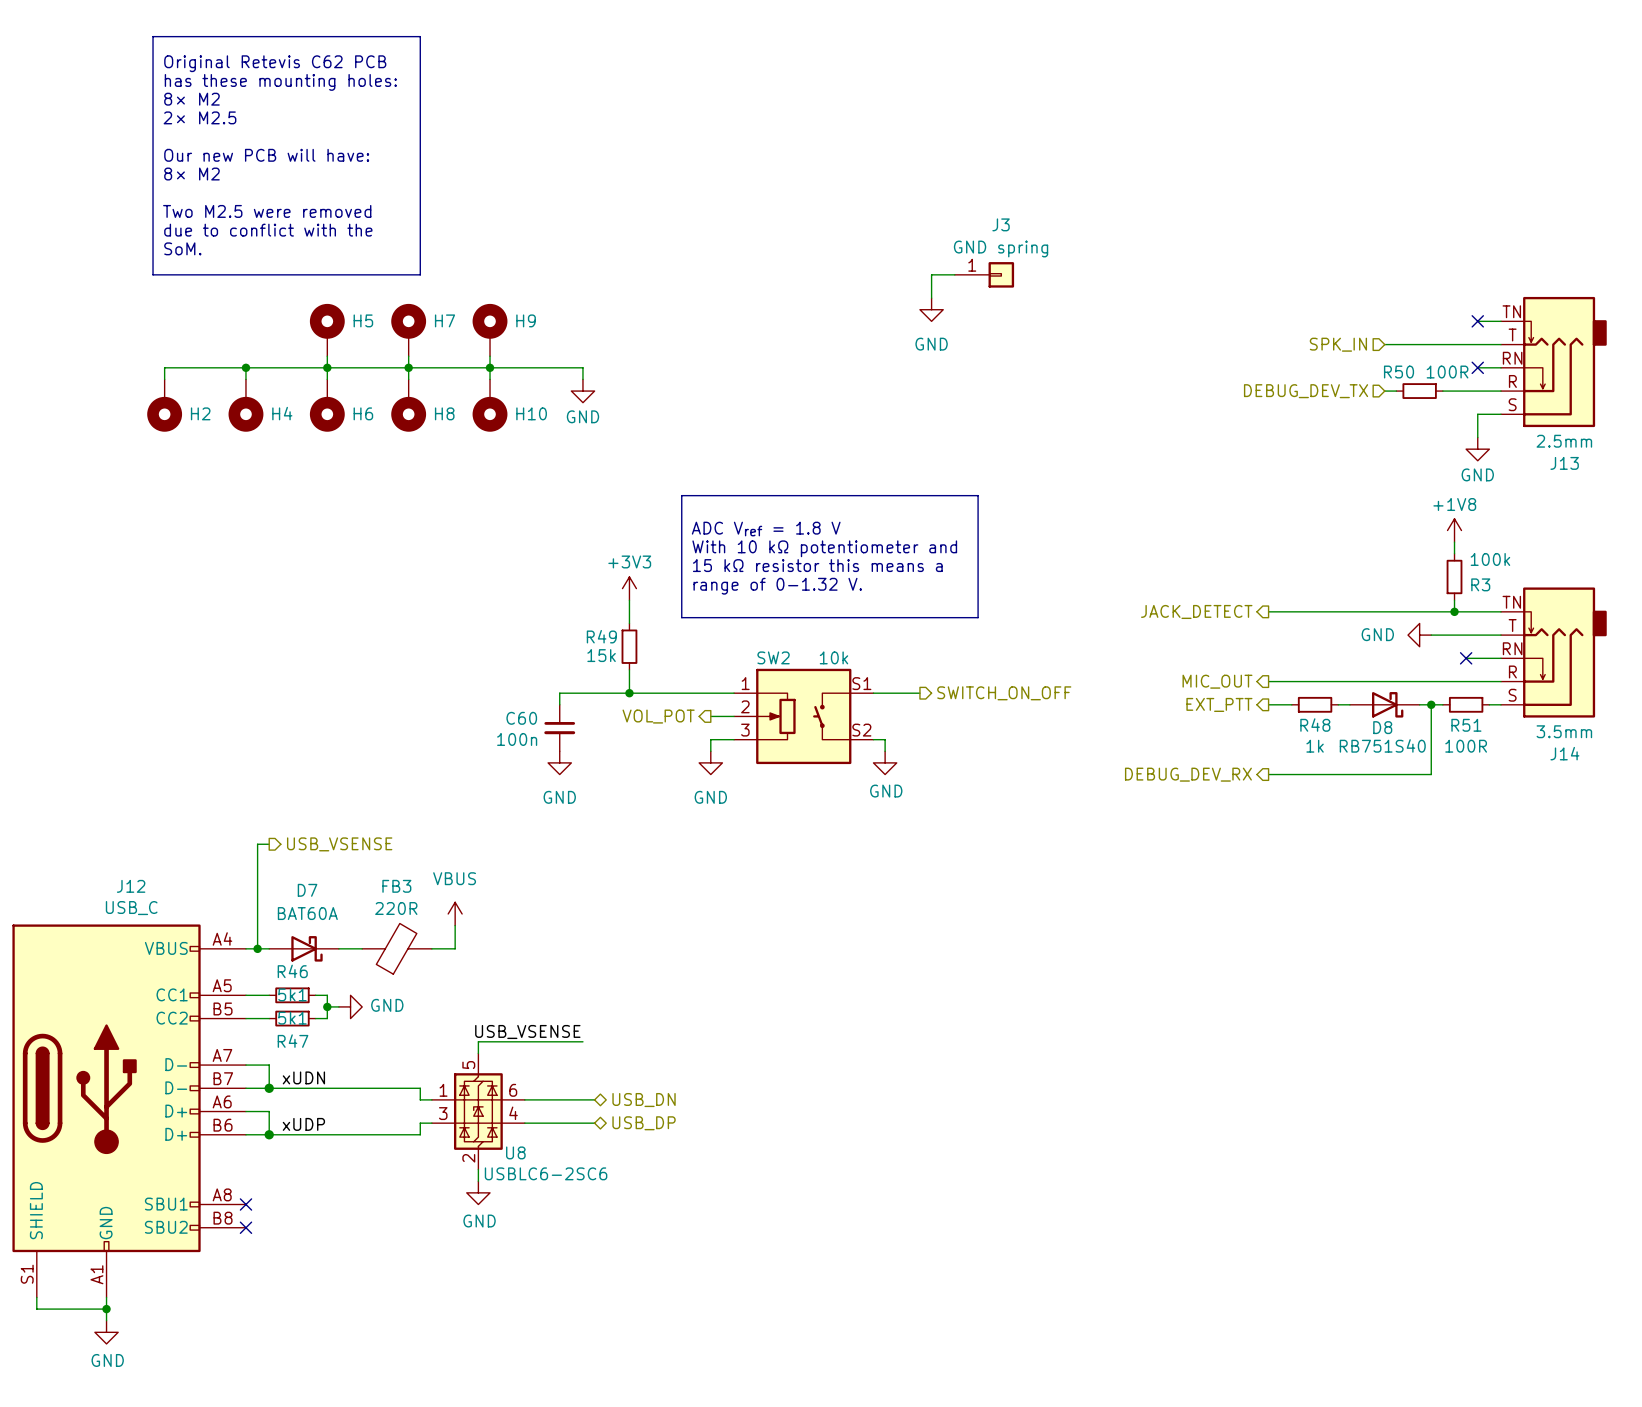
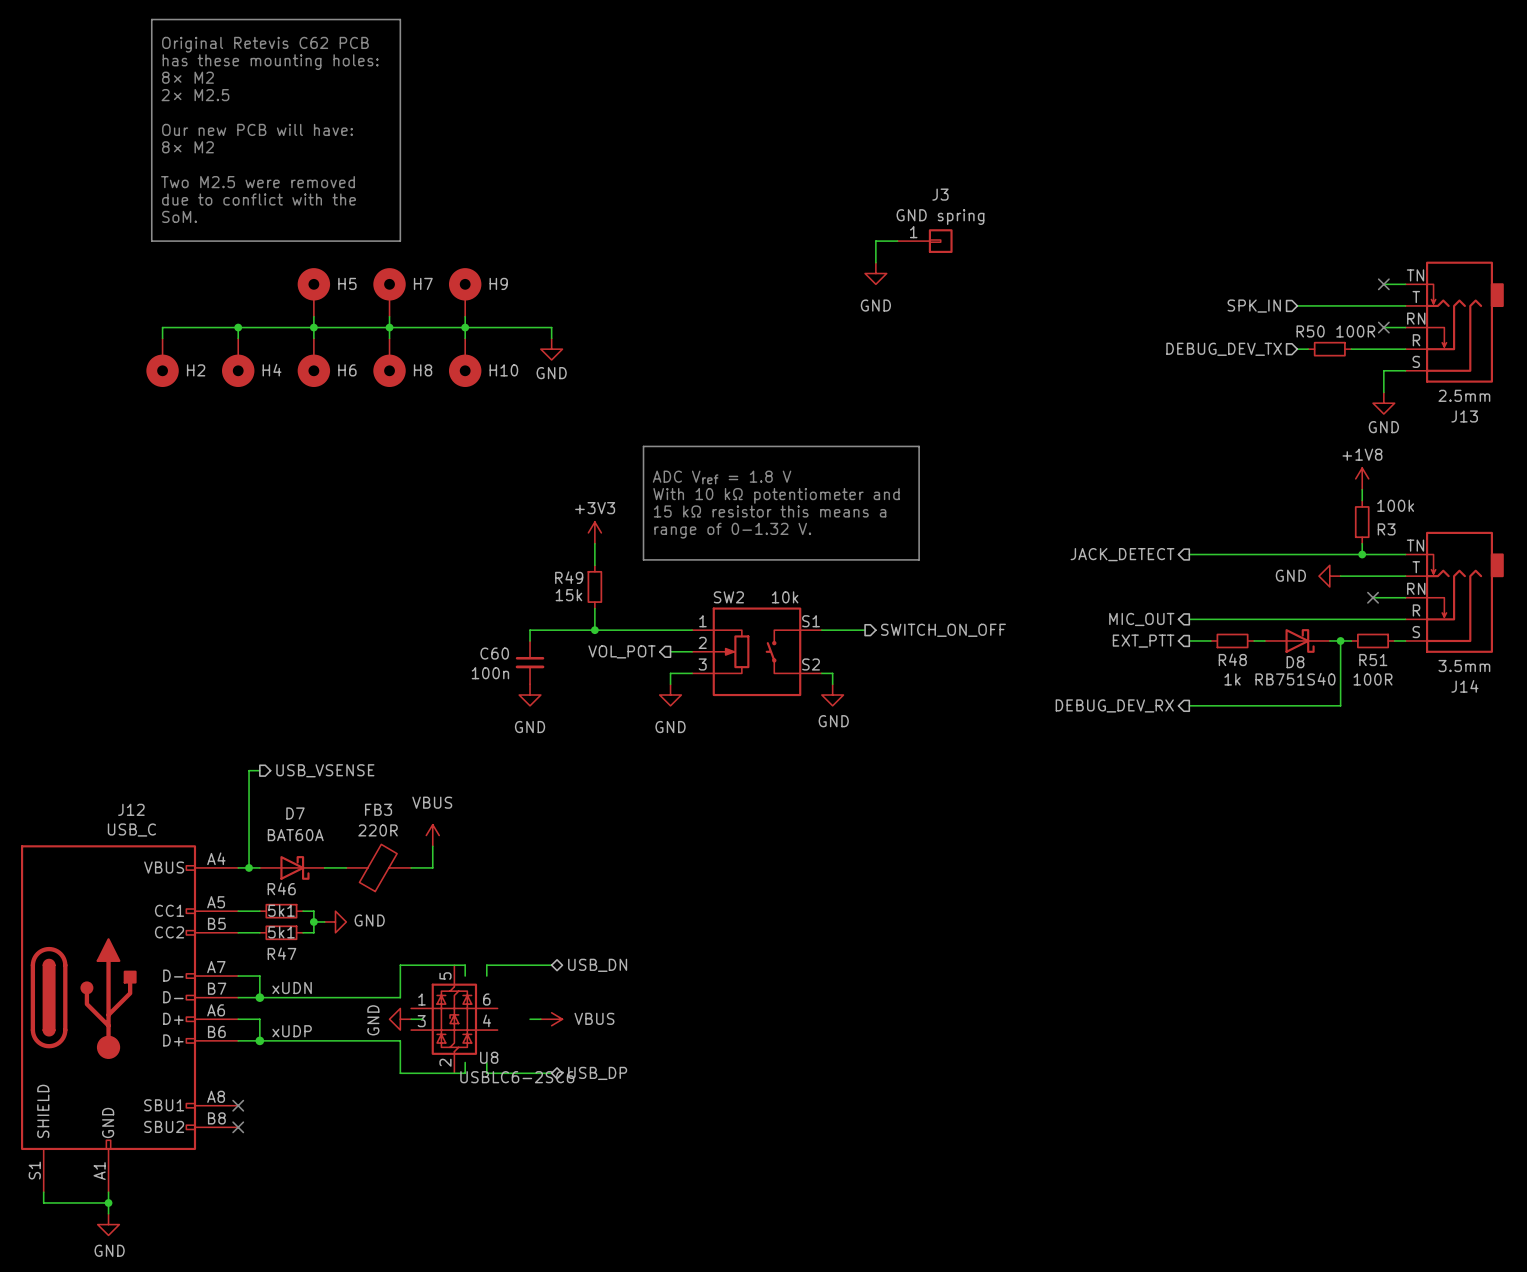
label: USB_VSENSE (527, 1031) -> none
wire: (582, 1041) (478, 1041) (478, 1053) -> none
wire: none -> (551, 965) (486, 965) (486, 976)
wire: (420, 1088) (420, 1099) (431, 1099) -> (400, 997) (400, 965) (465, 965) (465, 976)
wire: (524, 1099) (594, 1099) -> none
hierarchical label position: USB_DN (644, 1100) -> USB_DN (597, 965)
wire: none -> (411, 1019) (421, 1019)
wire: none -> (530, 1019) (540, 1019)
power symbol: none -> VBUS (551, 1019)
wire: (431, 1123) (420, 1123) (420, 1134) -> (465, 1062) (465, 1073) (400, 1073) (400, 1040)
wire: (524, 1123) (594, 1123) -> none
hierarchical label position: USB_DP (644, 1123) -> USB_DP (597, 1073)
wire: none -> (486, 1062) (486, 1073) (551, 1073)
wire: (478, 1169) (478, 1181) -> none
power symbol rotation: 0° (478, 1192) -> 90° clockwise (400, 1019)
power symbol position: GND (478, 1192) -> GND (400, 1019)

